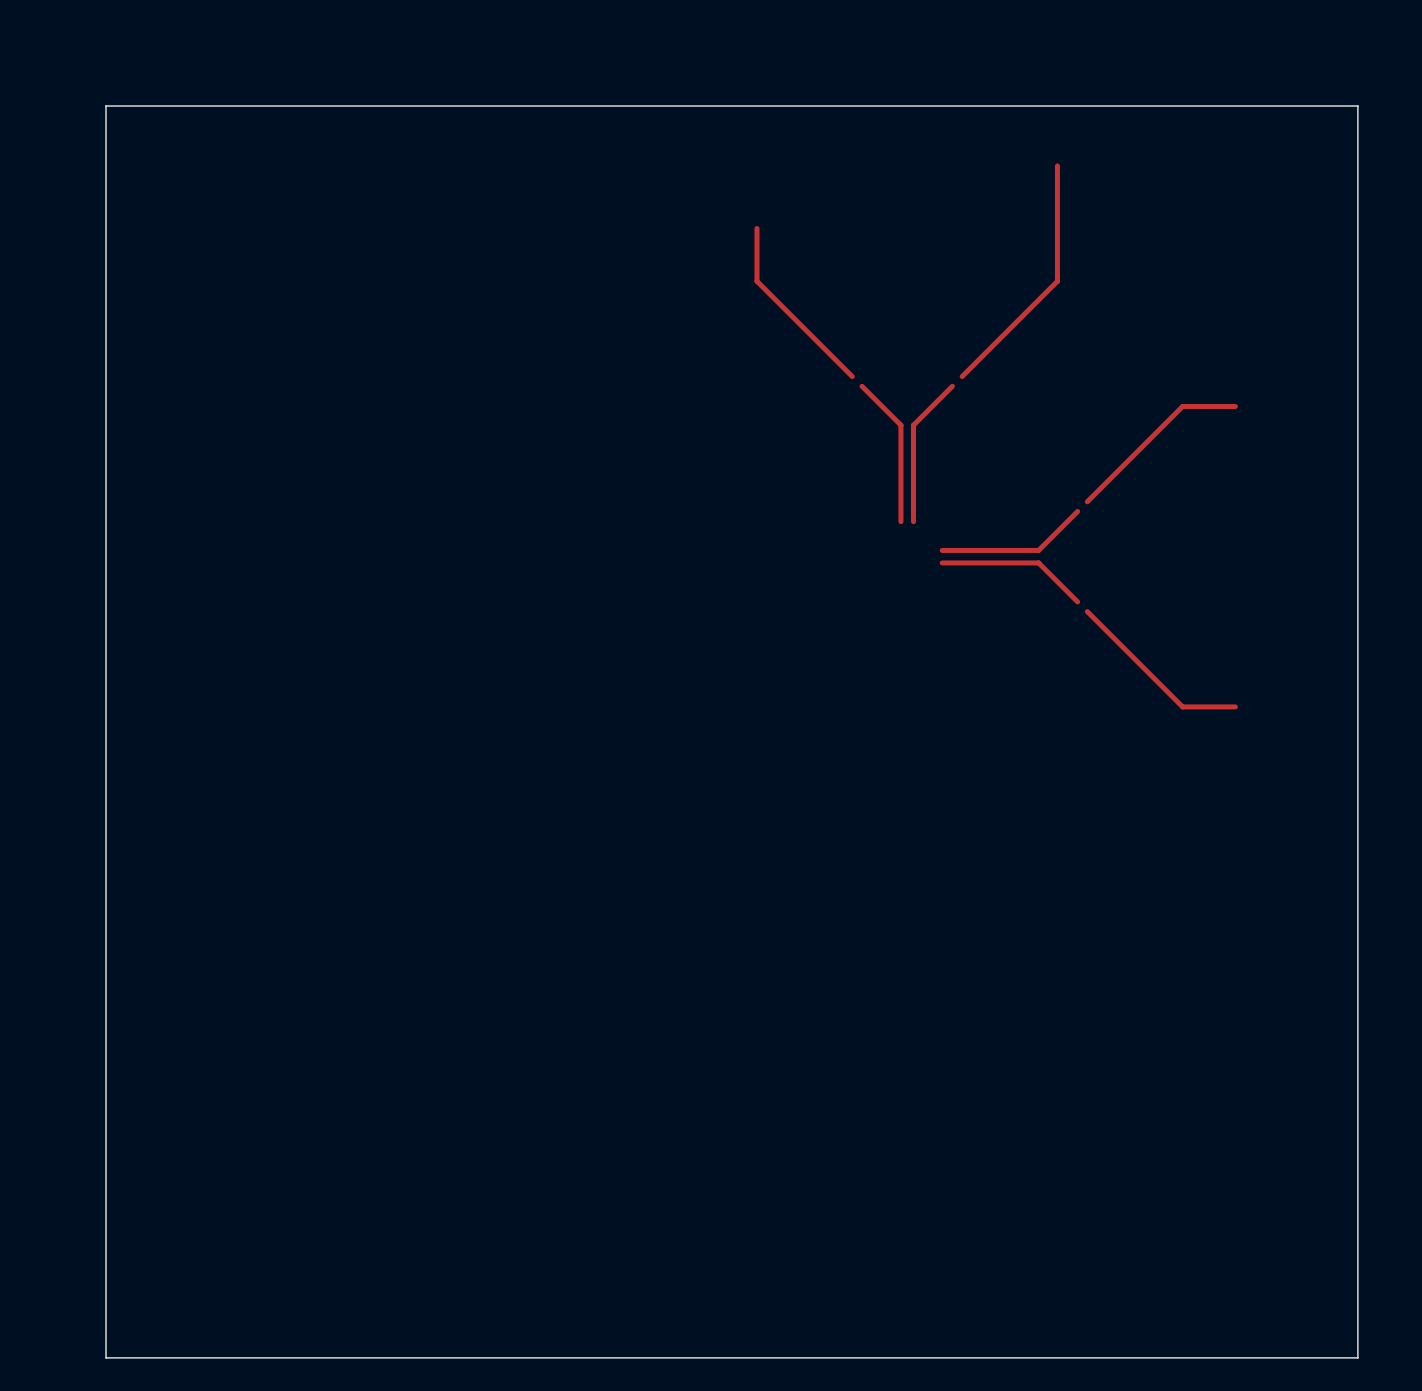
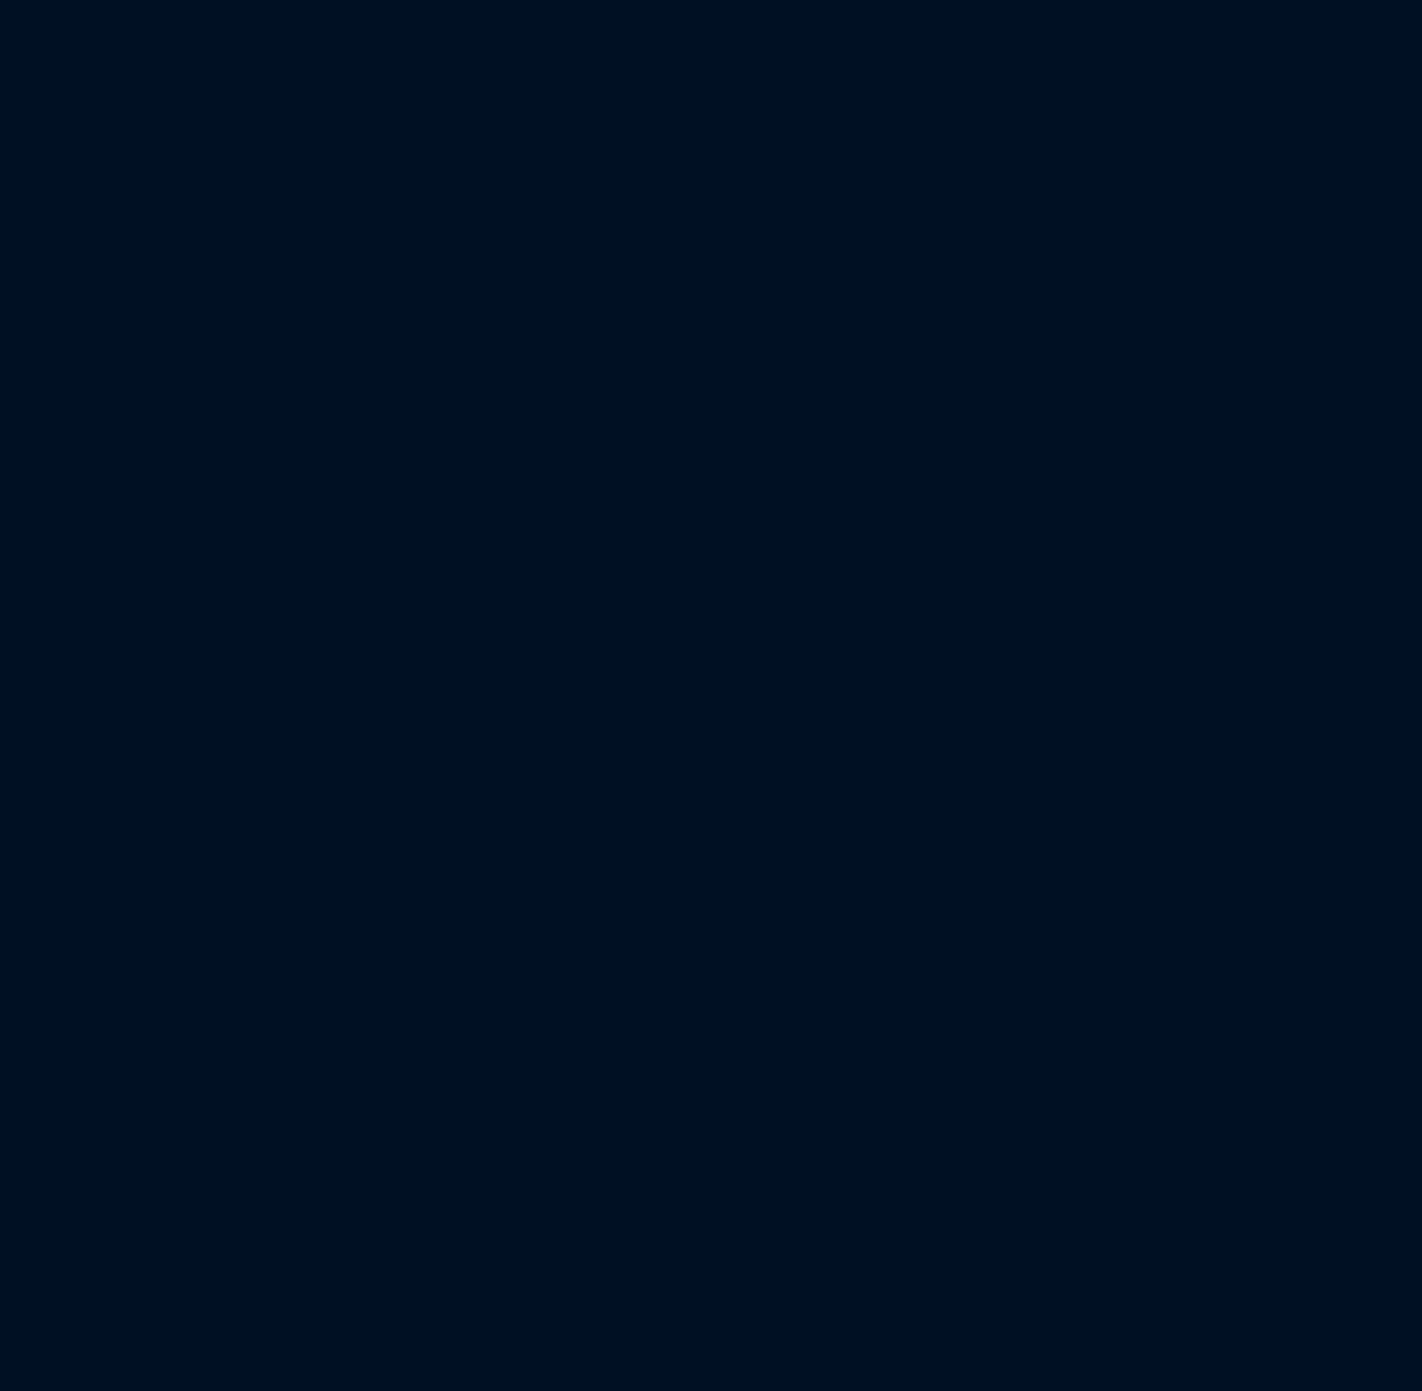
board edge: (106, 106) (1357, 106) (1357, 1357) (106, 1357) (106, 106) -> none
top track: (1057, 165) (1057, 281) (962, 376) -> none
top track: (756, 228) (756, 281) (852, 376) -> none
top track: (862, 386) (900, 425) (900, 521) -> none
top track: (952, 386) (913, 425) (913, 521) -> none
top track: (1235, 406) (1182, 406) (1087, 501) -> none
top track: (1077, 511) (1038, 550) (942, 550) -> none
top track: (942, 562) (1038, 562) (1077, 601) -> none
top track: (1087, 611) (1182, 706) (1235, 706) -> none

